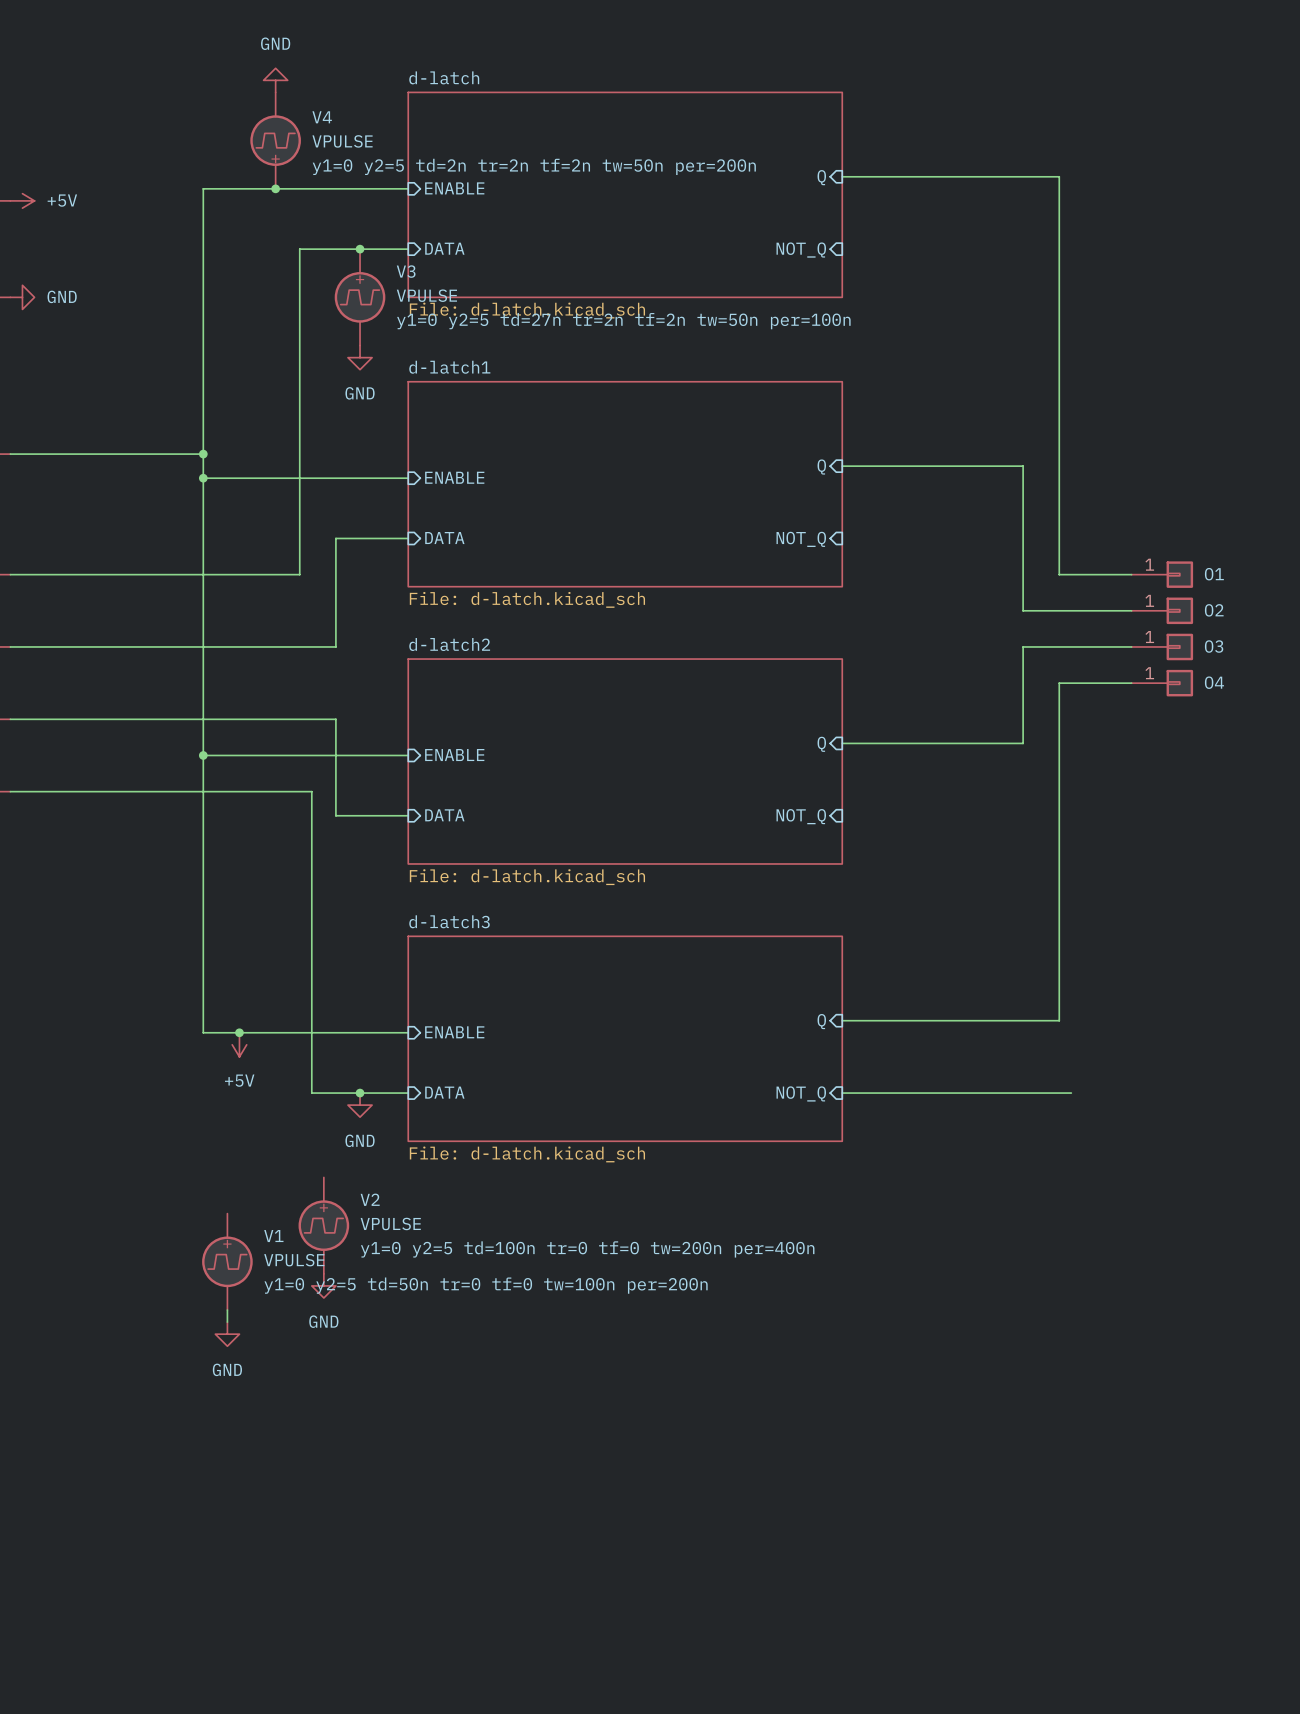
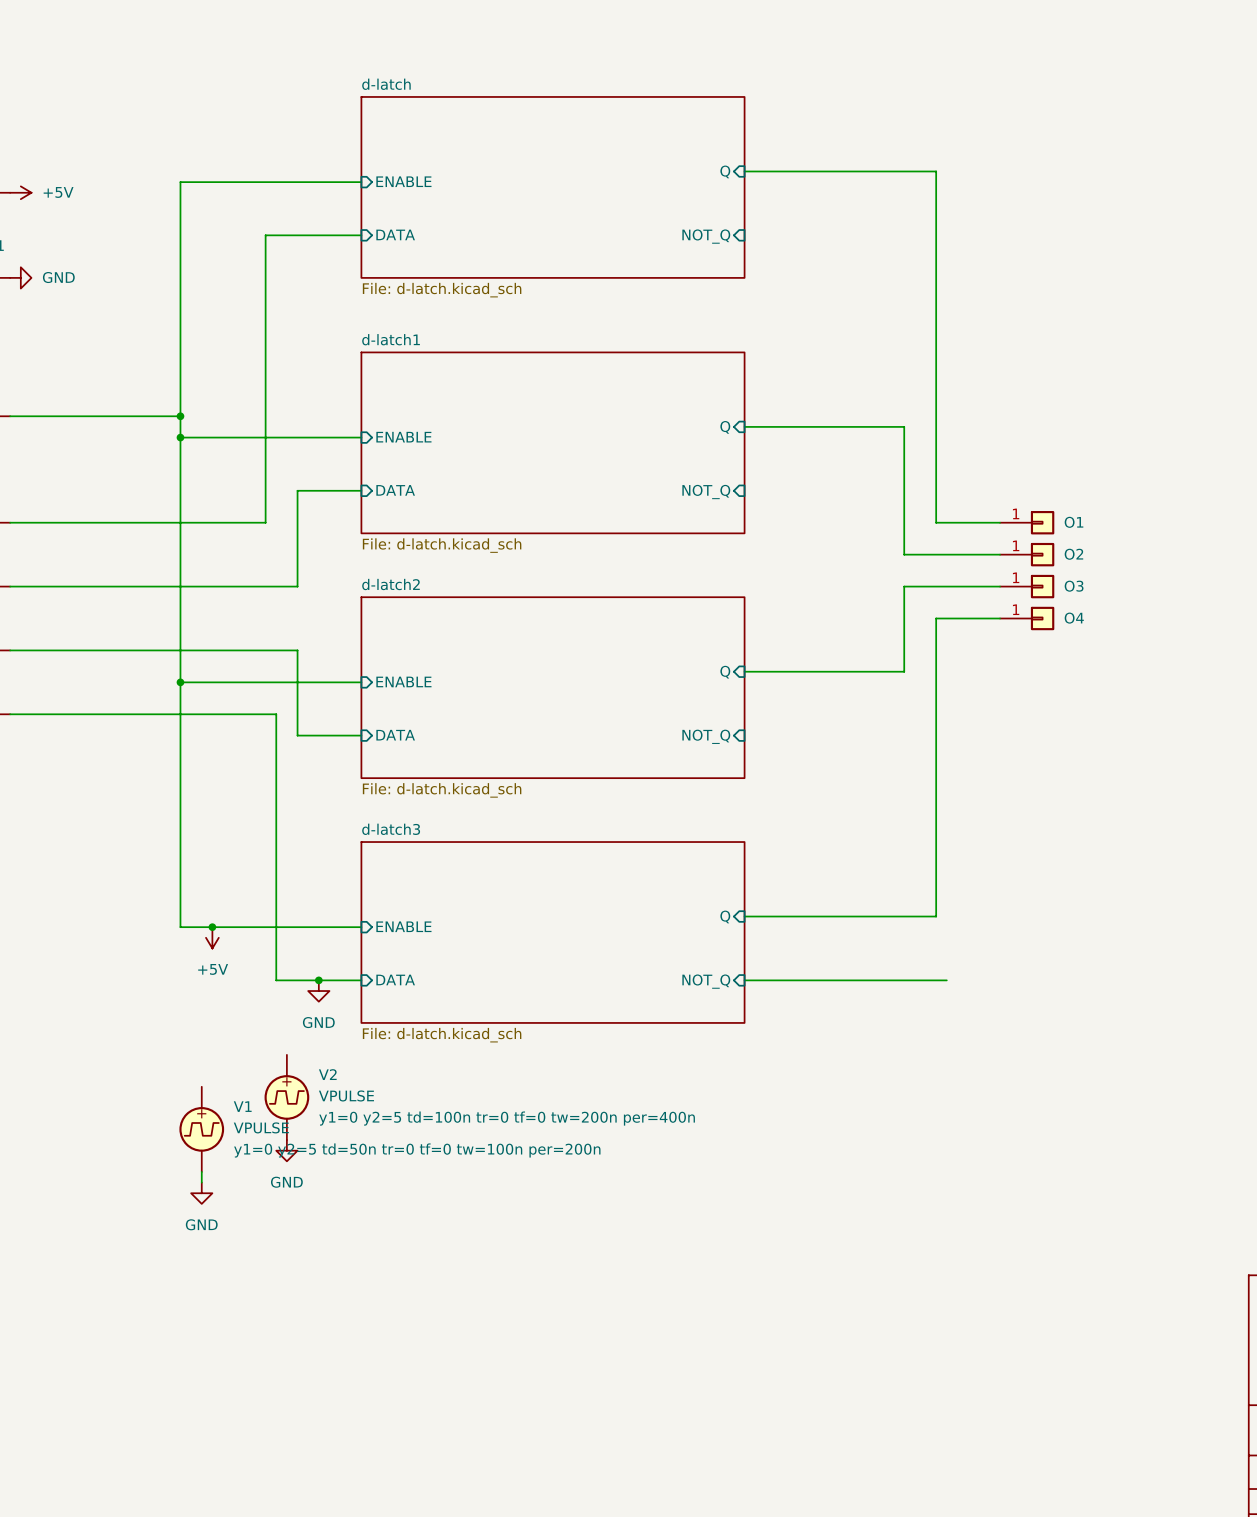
power symbol: GND (275, 80) -> none
V4: VPULSE (275, 140) -> none
junction: (275, 188) -> none
junction: (360, 249) -> none
V3: VPULSE (360, 297) -> none
power symbol: GND (360, 357) -> none

